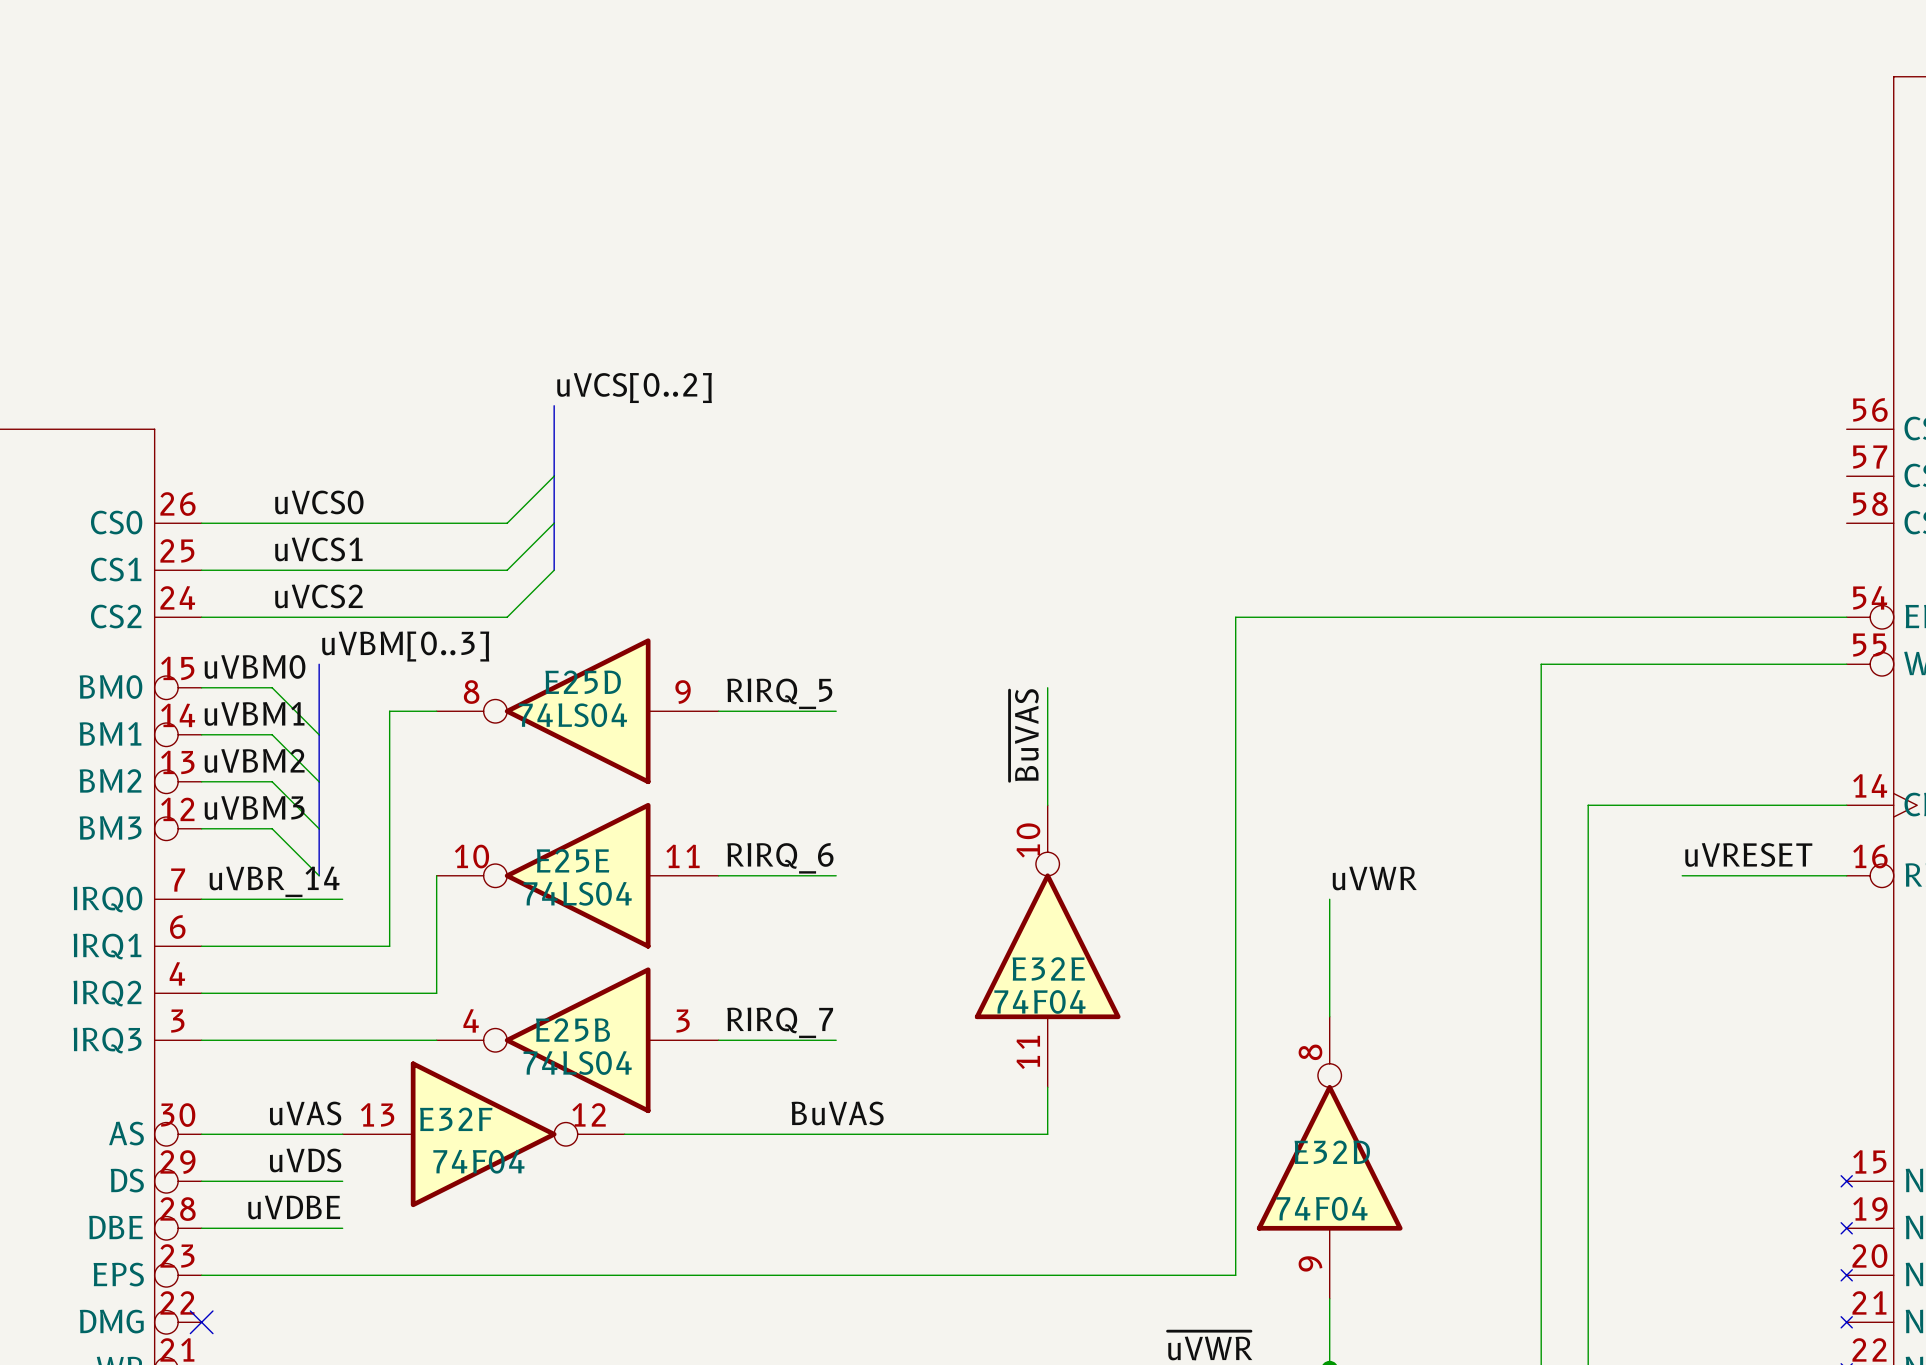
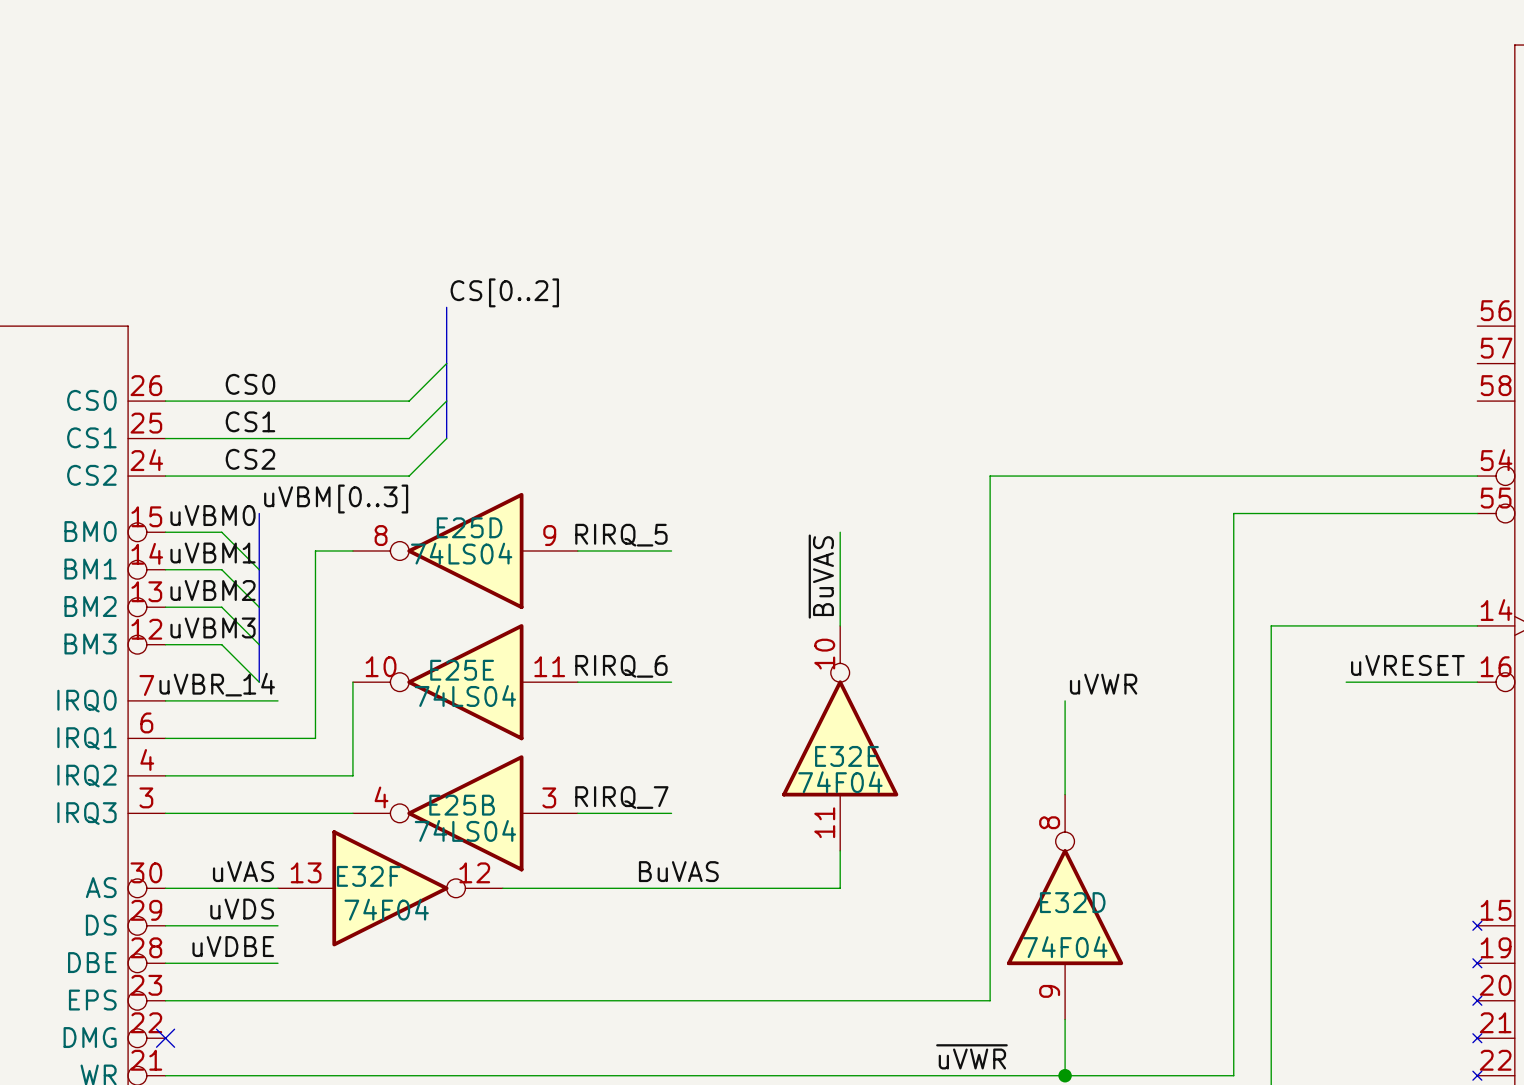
label: uVCS[0..2] (634, 388) -> CS[0..2] (504, 292)
label: uVCS0 (319, 502) -> CS0 (250, 384)
label: uVCS1 (318, 549) -> CS1 (250, 421)
label: uVCS2 (318, 596) -> CS2 (250, 459)

